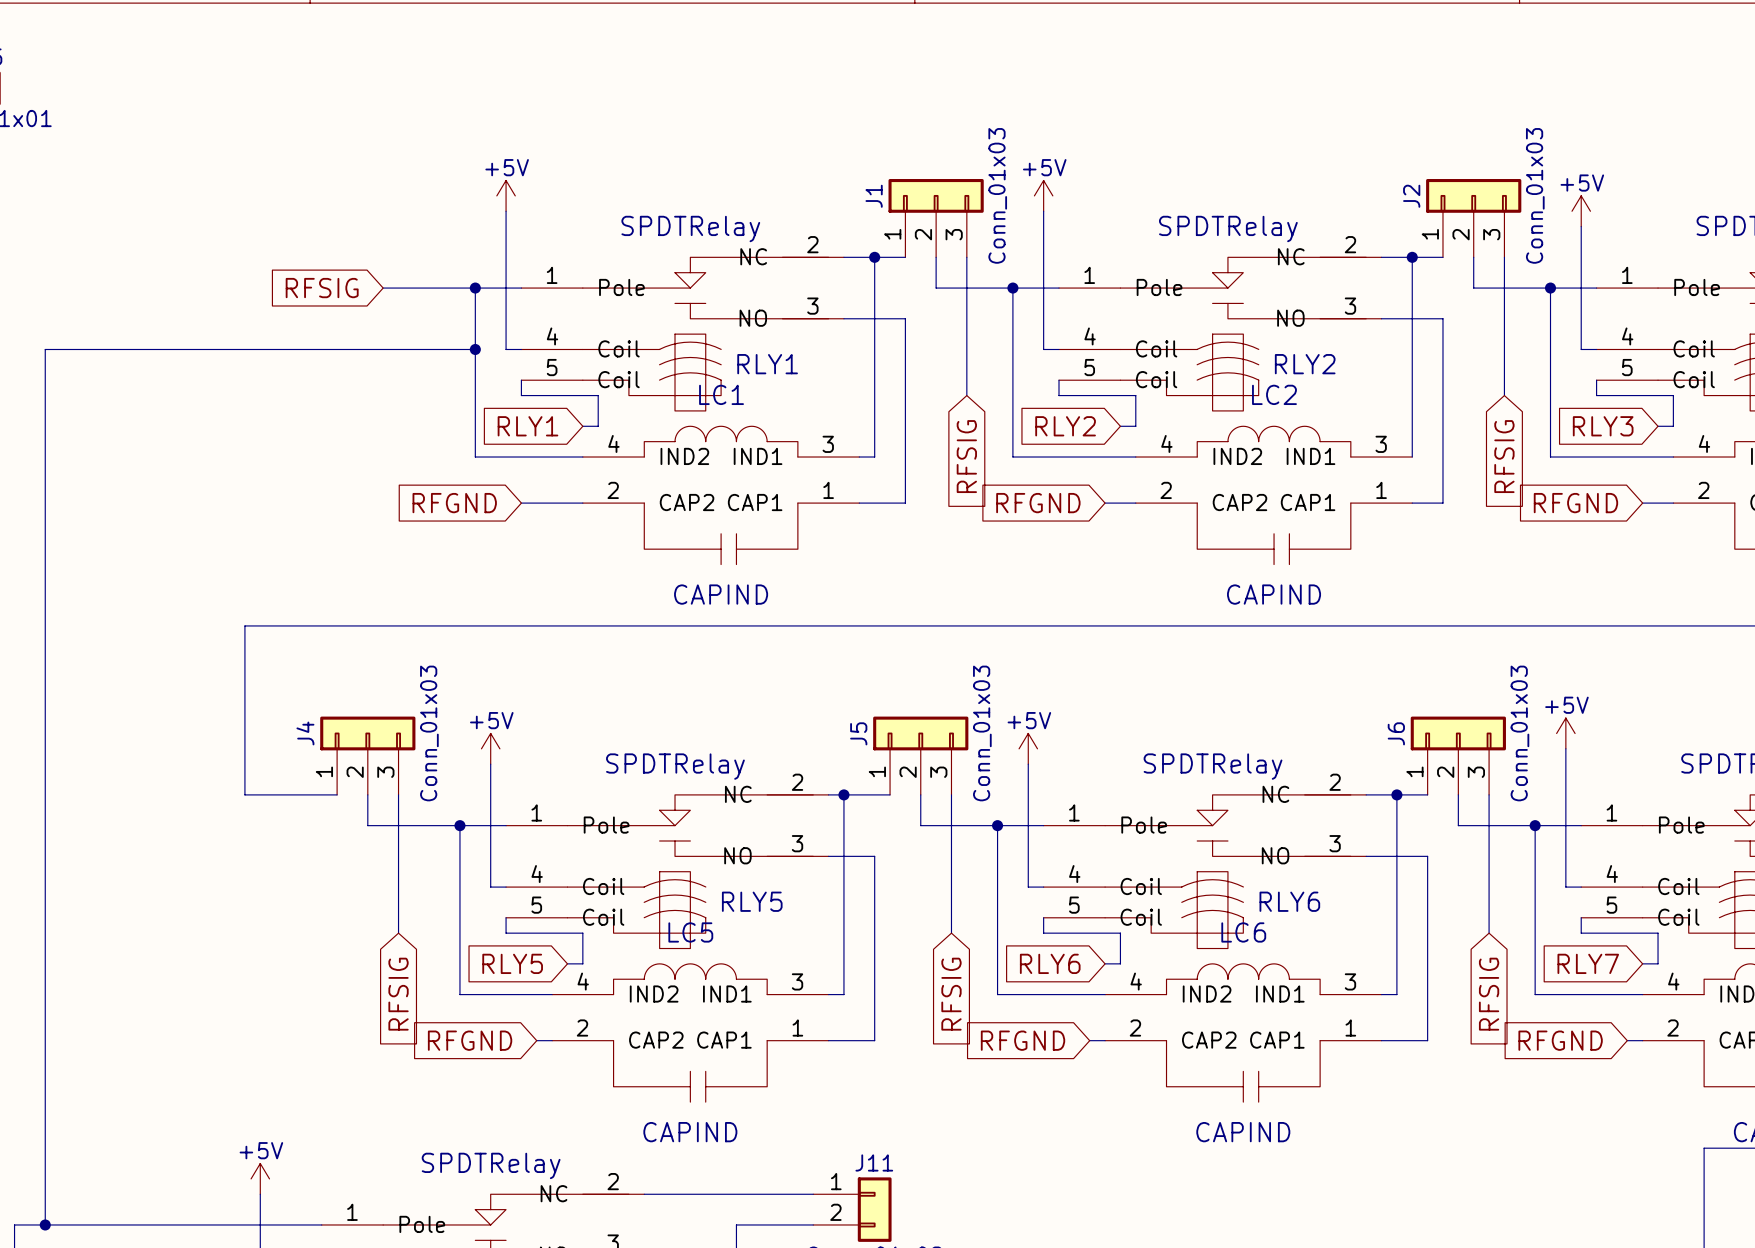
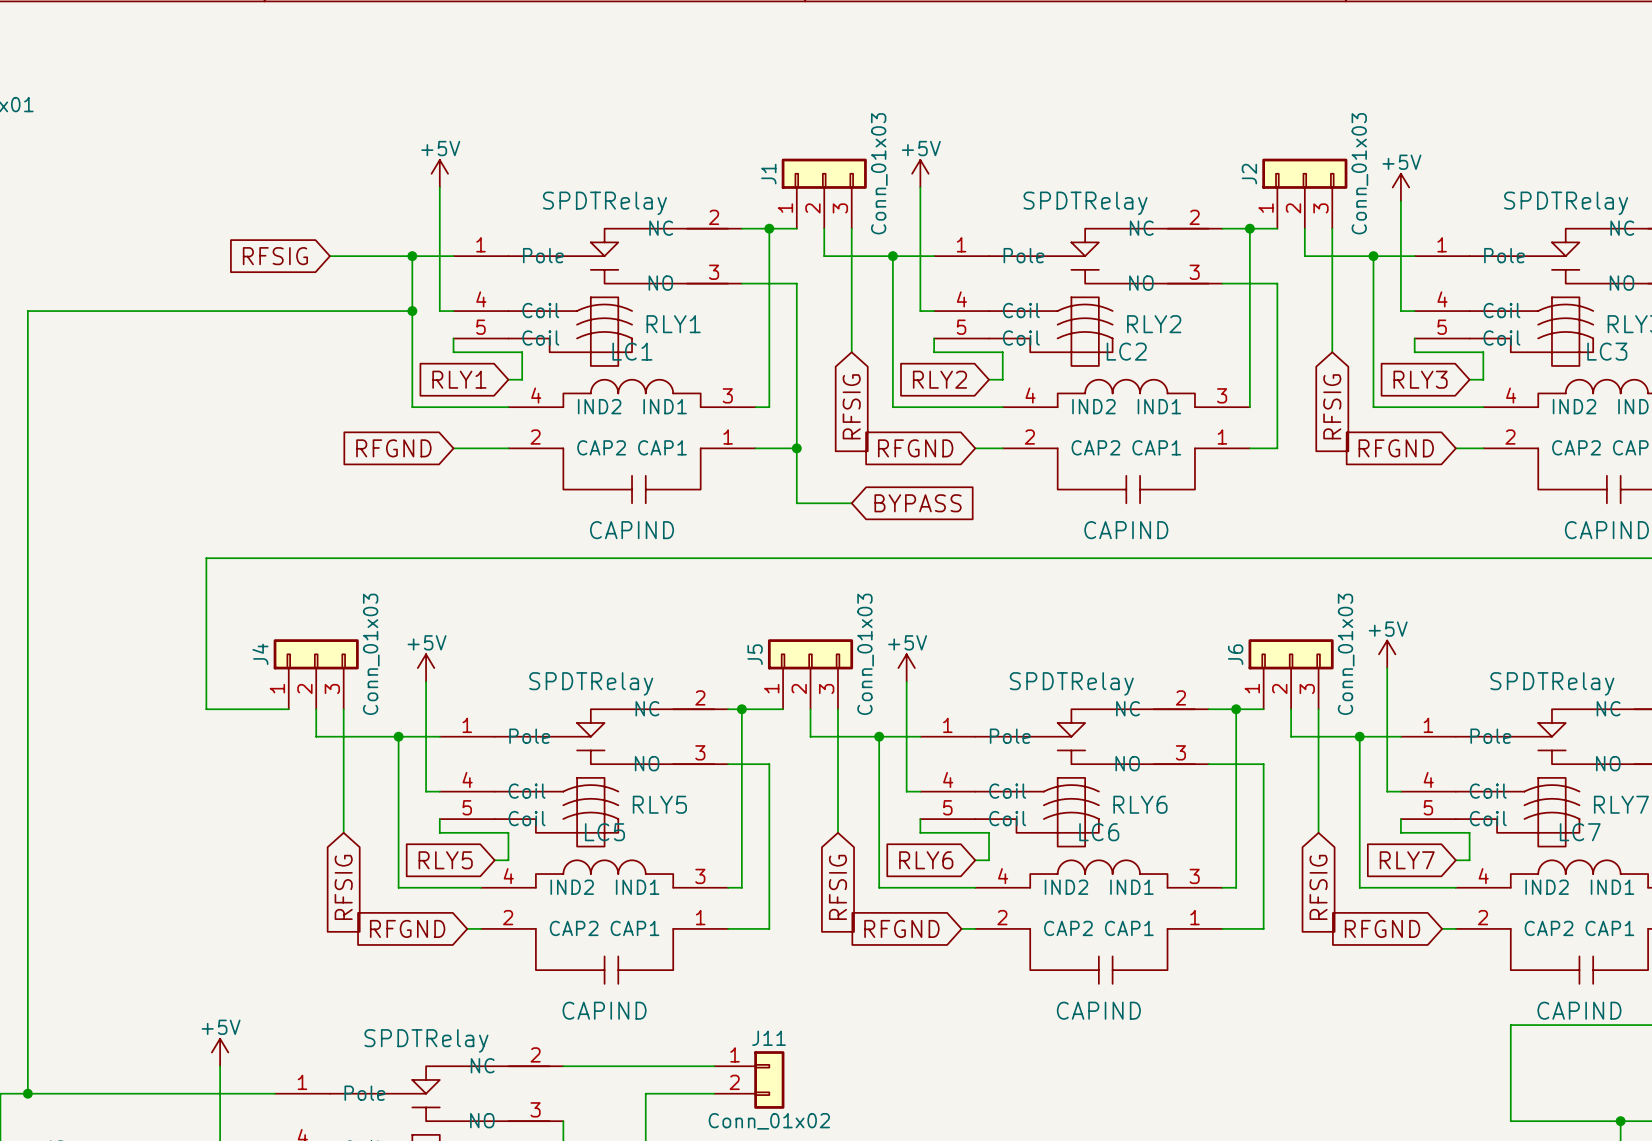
wire: none -> (796, 448) (796, 503) (851, 503)
junction: none -> (796, 448)
global label: none -> BYPASS (918, 503)

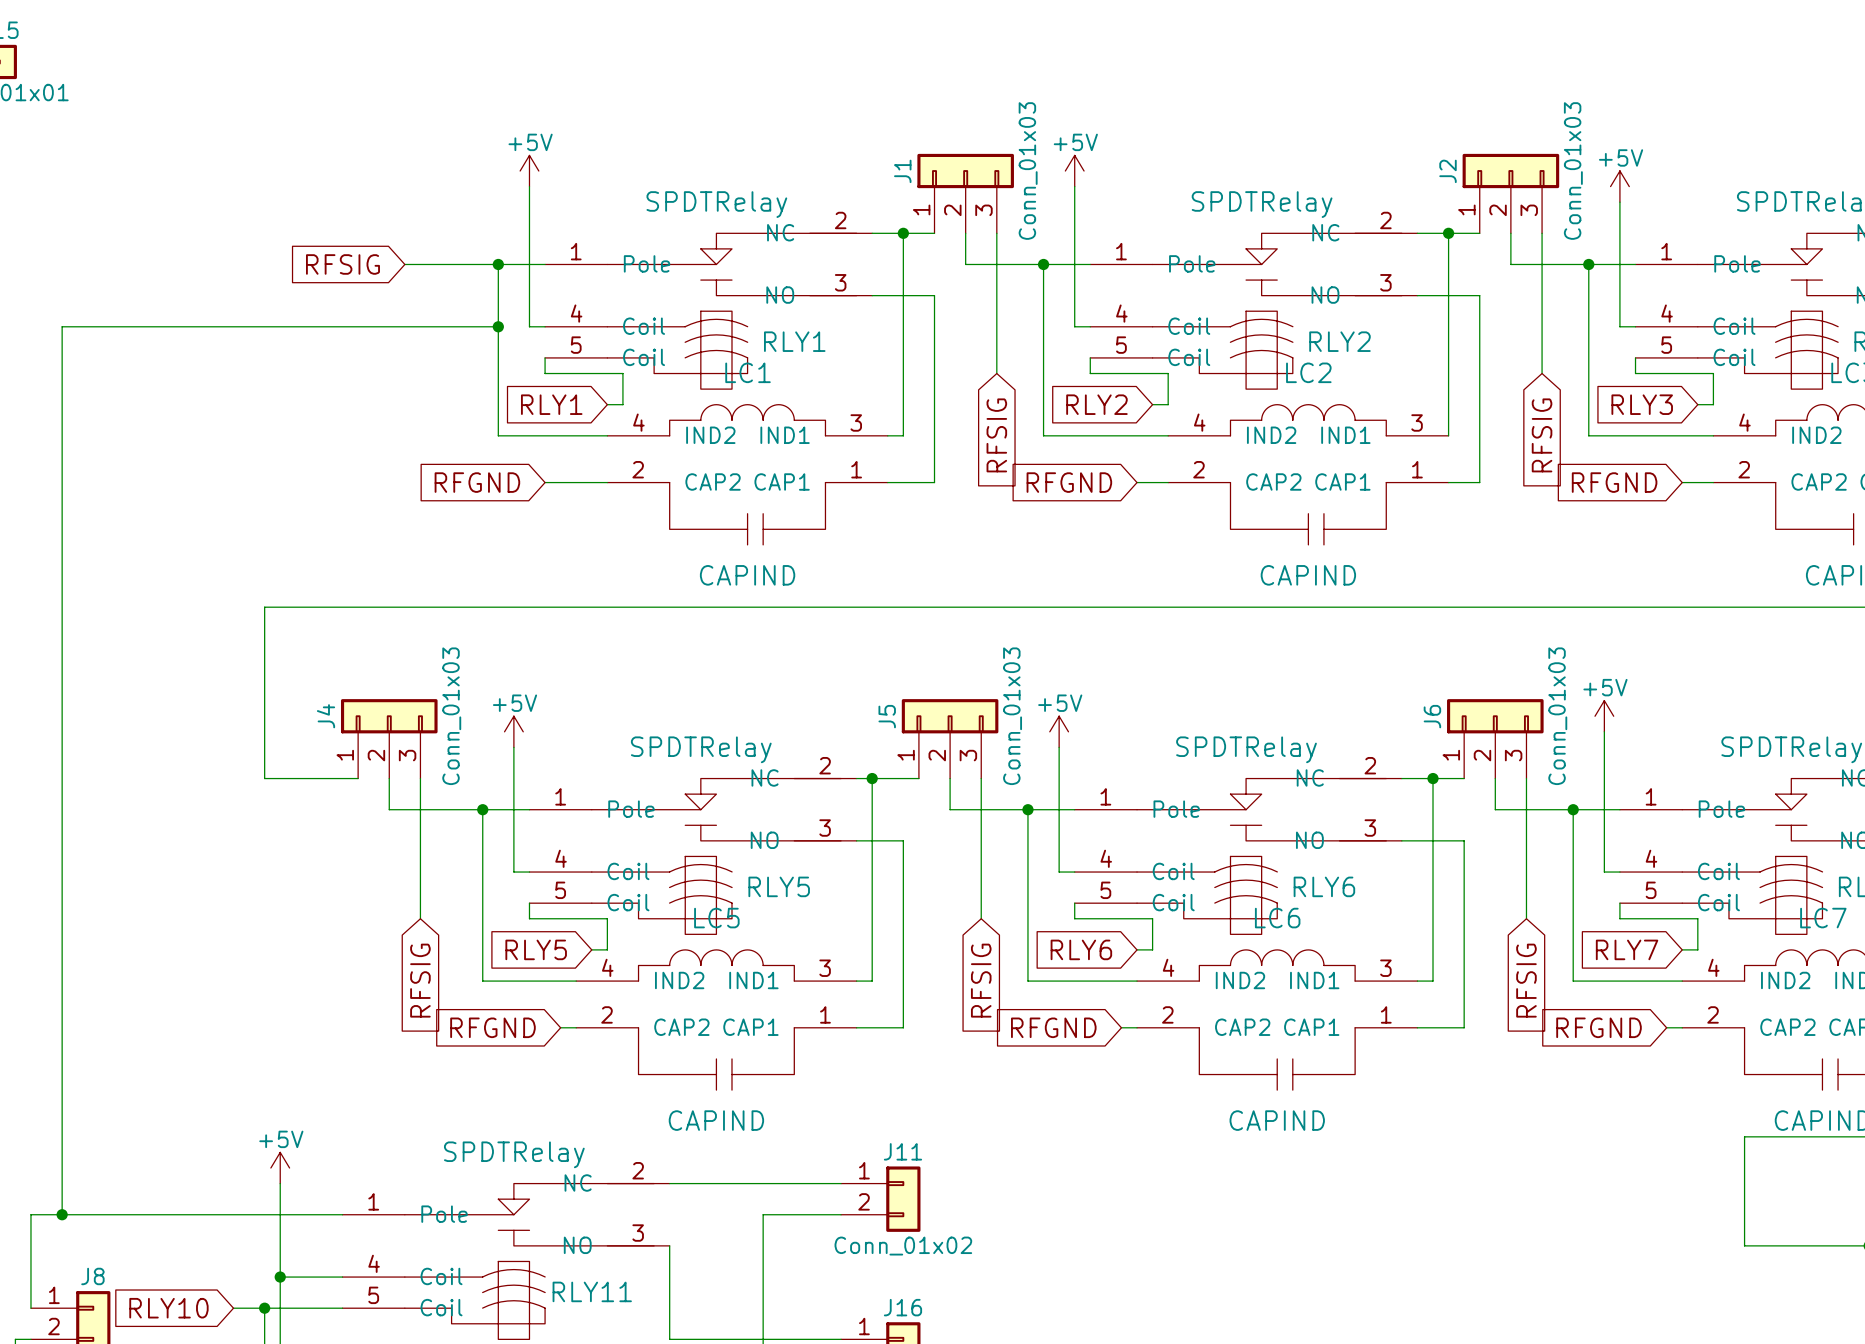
wire: (796, 448) (796, 503) (851, 503) -> none
junction: (796, 448) -> none
global label: BYPASS (918, 503) -> none

